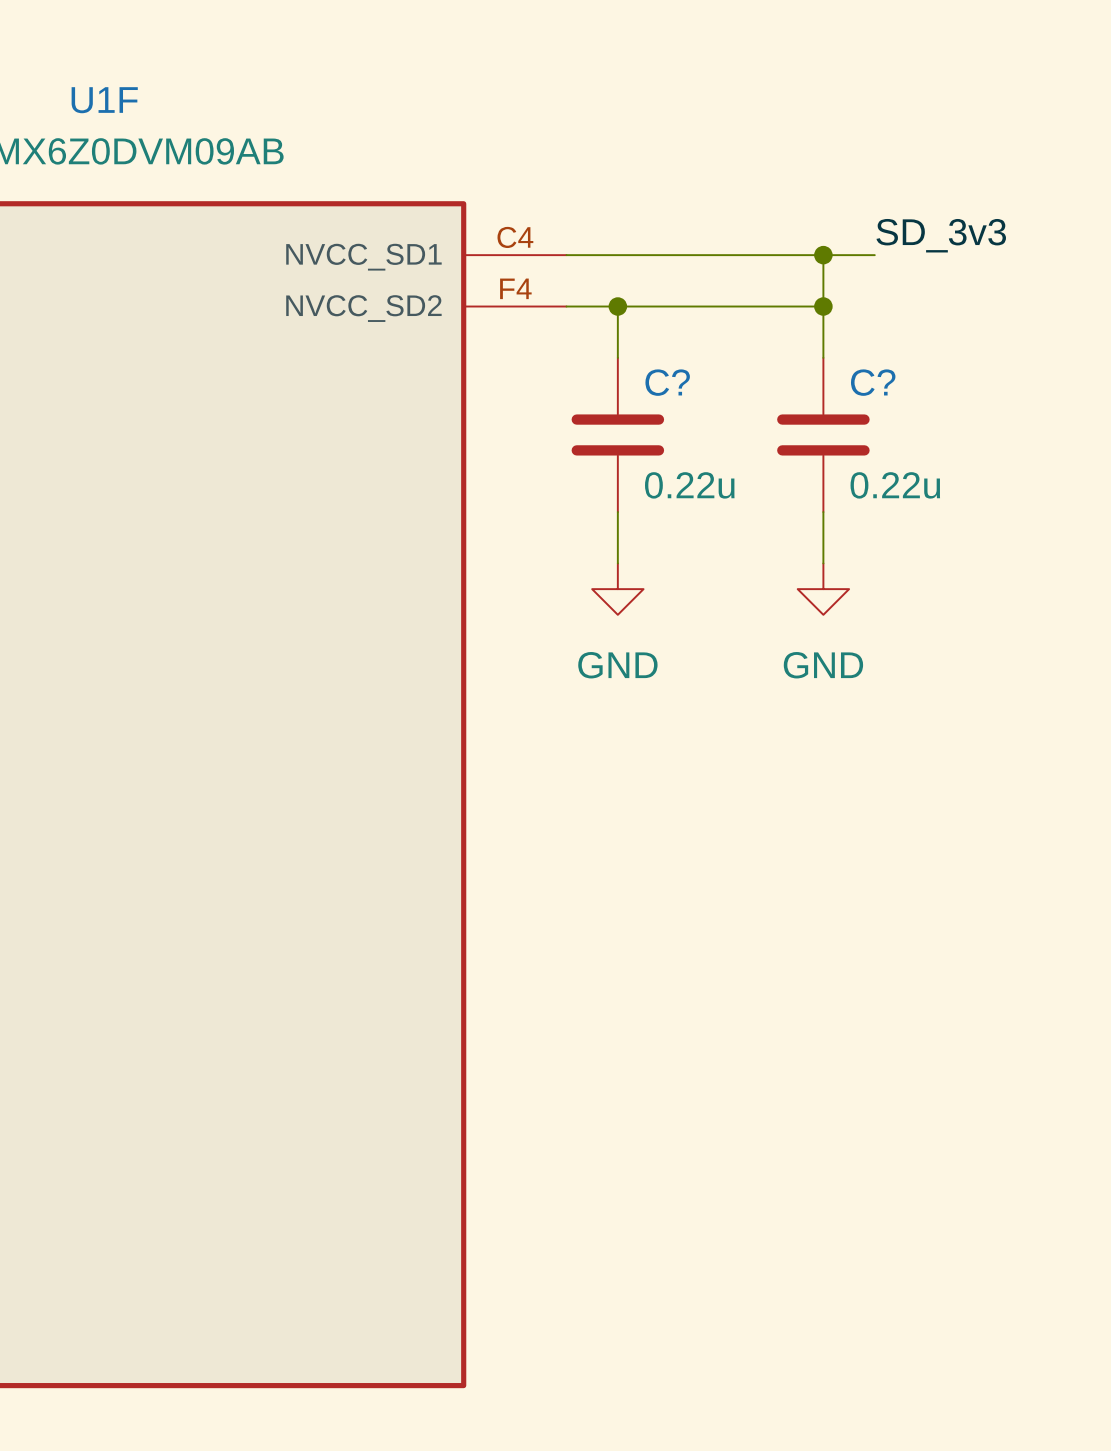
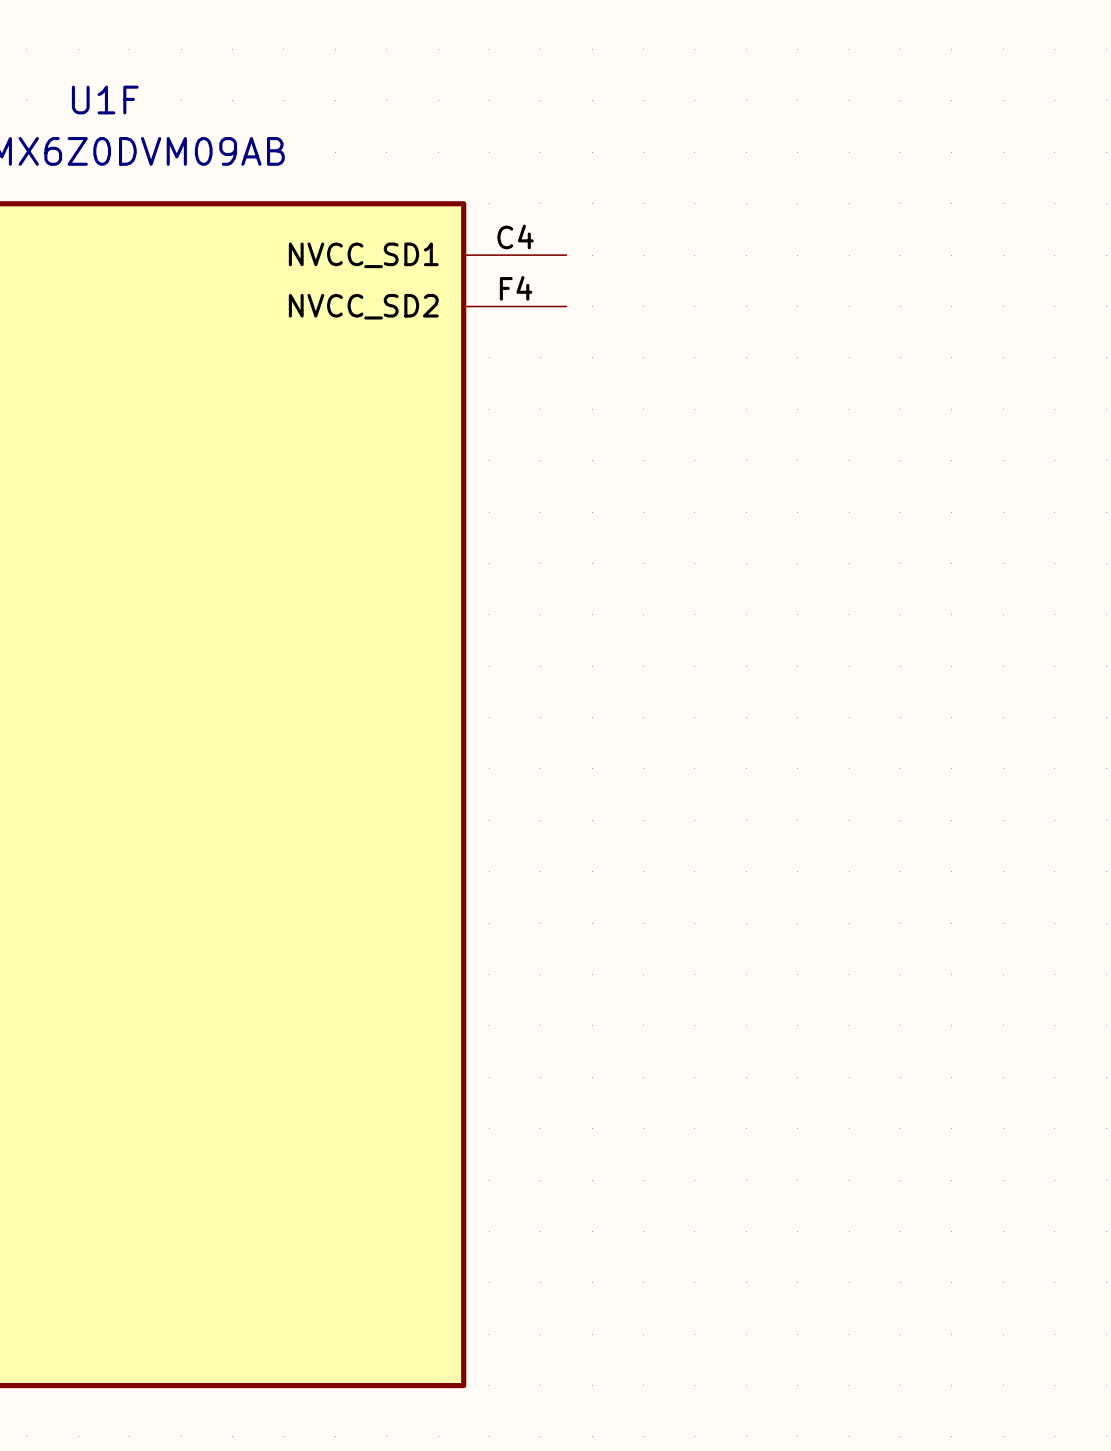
label: SD_3v3 (941, 235) -> none
wire: (566, 255) (874, 255) -> none
wire: (823, 255) (823, 357) -> none
junction: (823, 255) -> none
wire: (566, 306) (823, 306) -> none
wire: (617, 306) (617, 357) -> none
junction: (617, 306) -> none
junction: (823, 306) -> none
C?: 0.22u (617, 434) -> none
C?: 0.22u (823, 434) -> none
wire: (617, 512) (617, 563) -> none
wire: (823, 512) (823, 563) -> none
power symbol: GND (617, 589) -> none
power symbol: GND (823, 589) -> none

